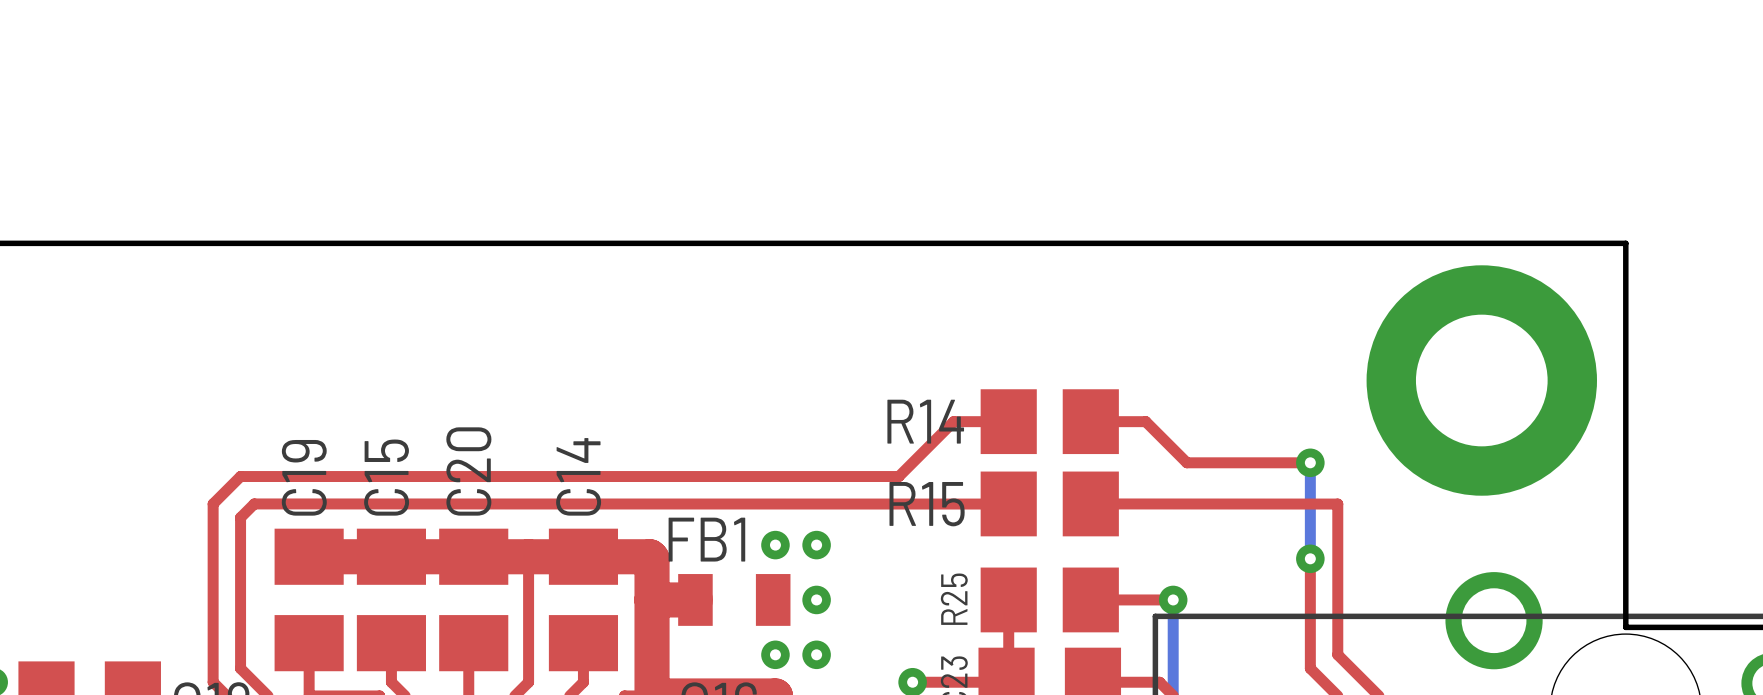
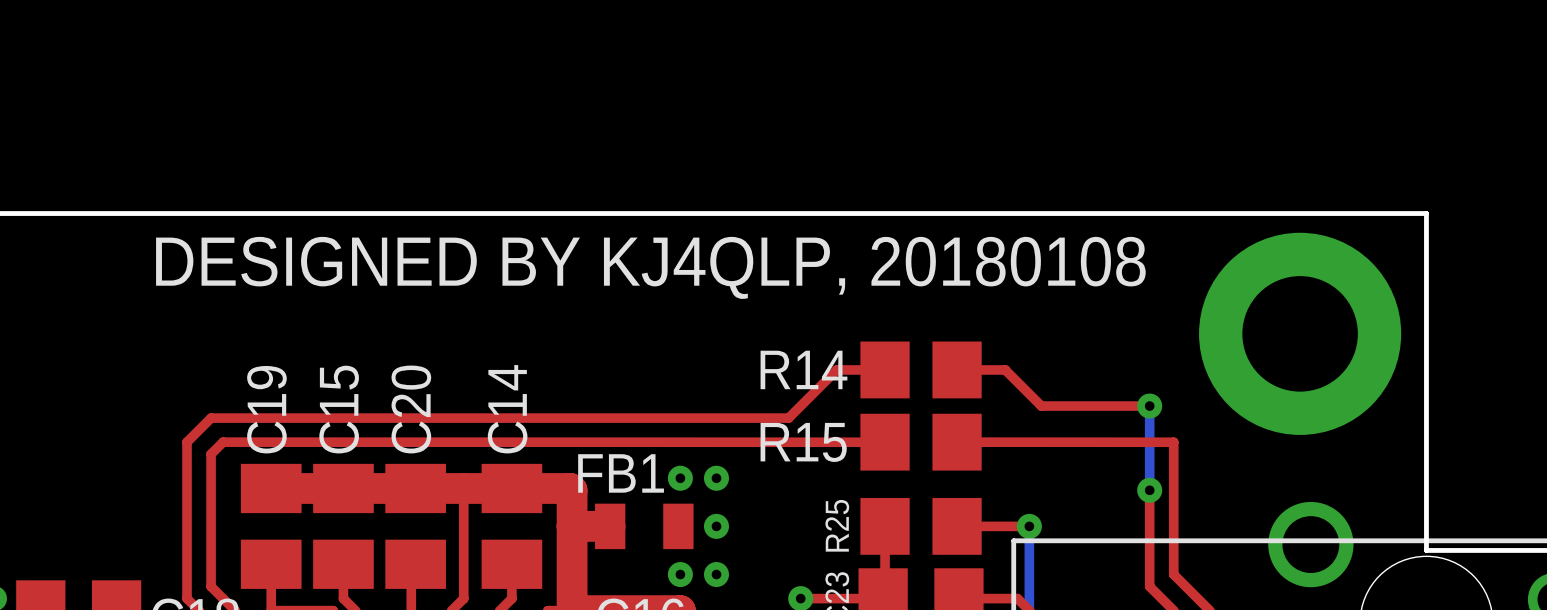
text: none -> DESIGNED BY KJ4QLP, 20180108 (650, 267)

